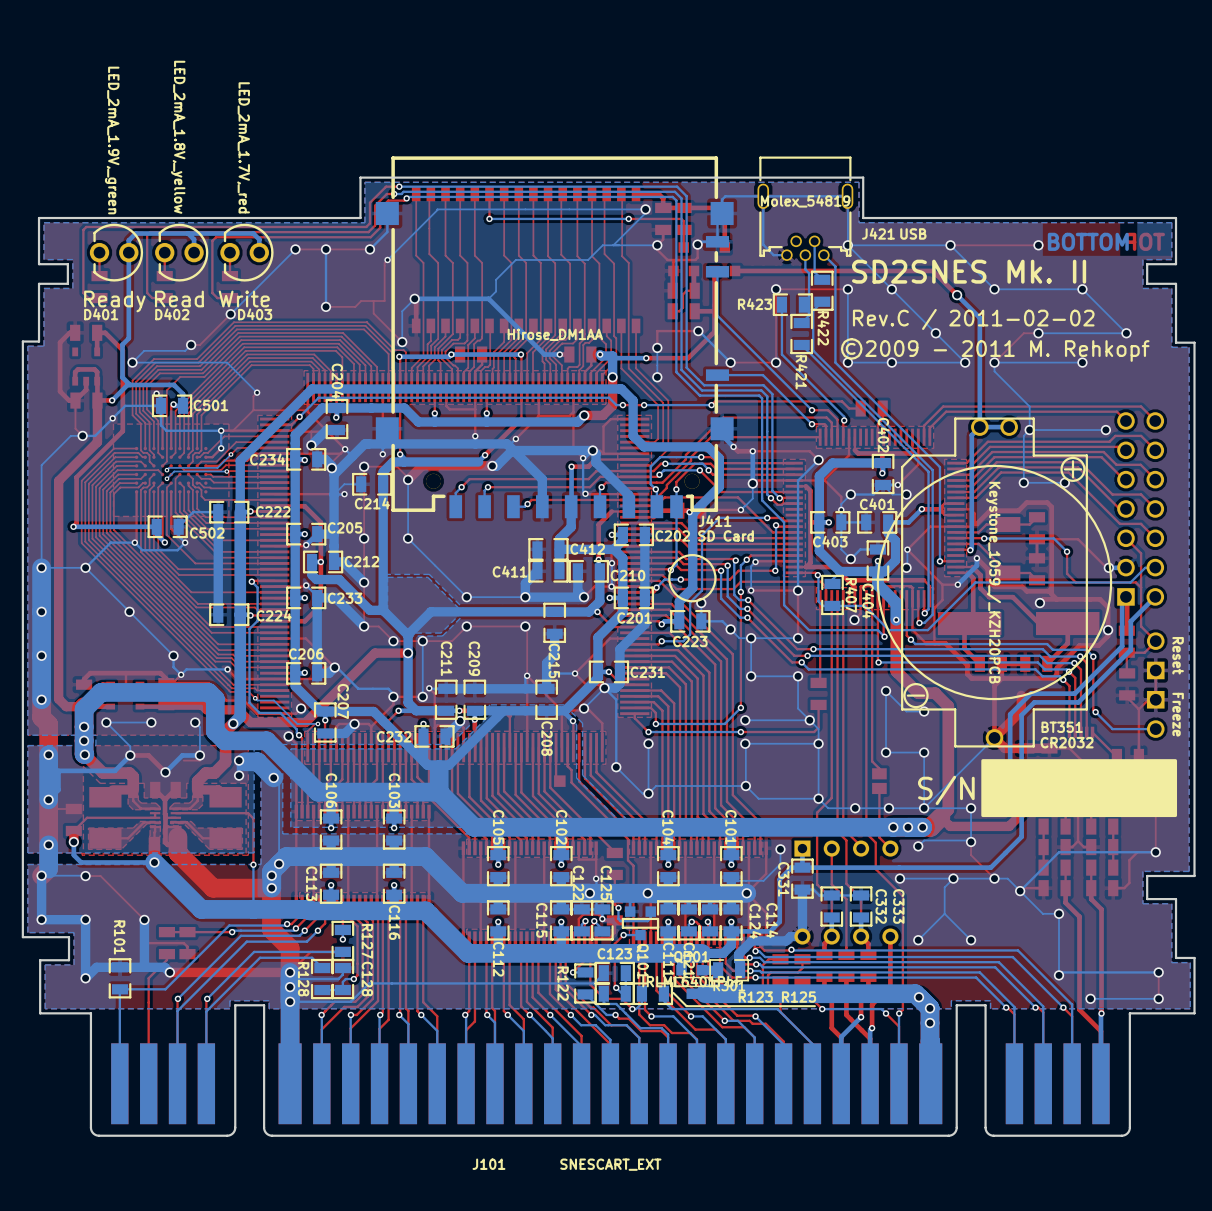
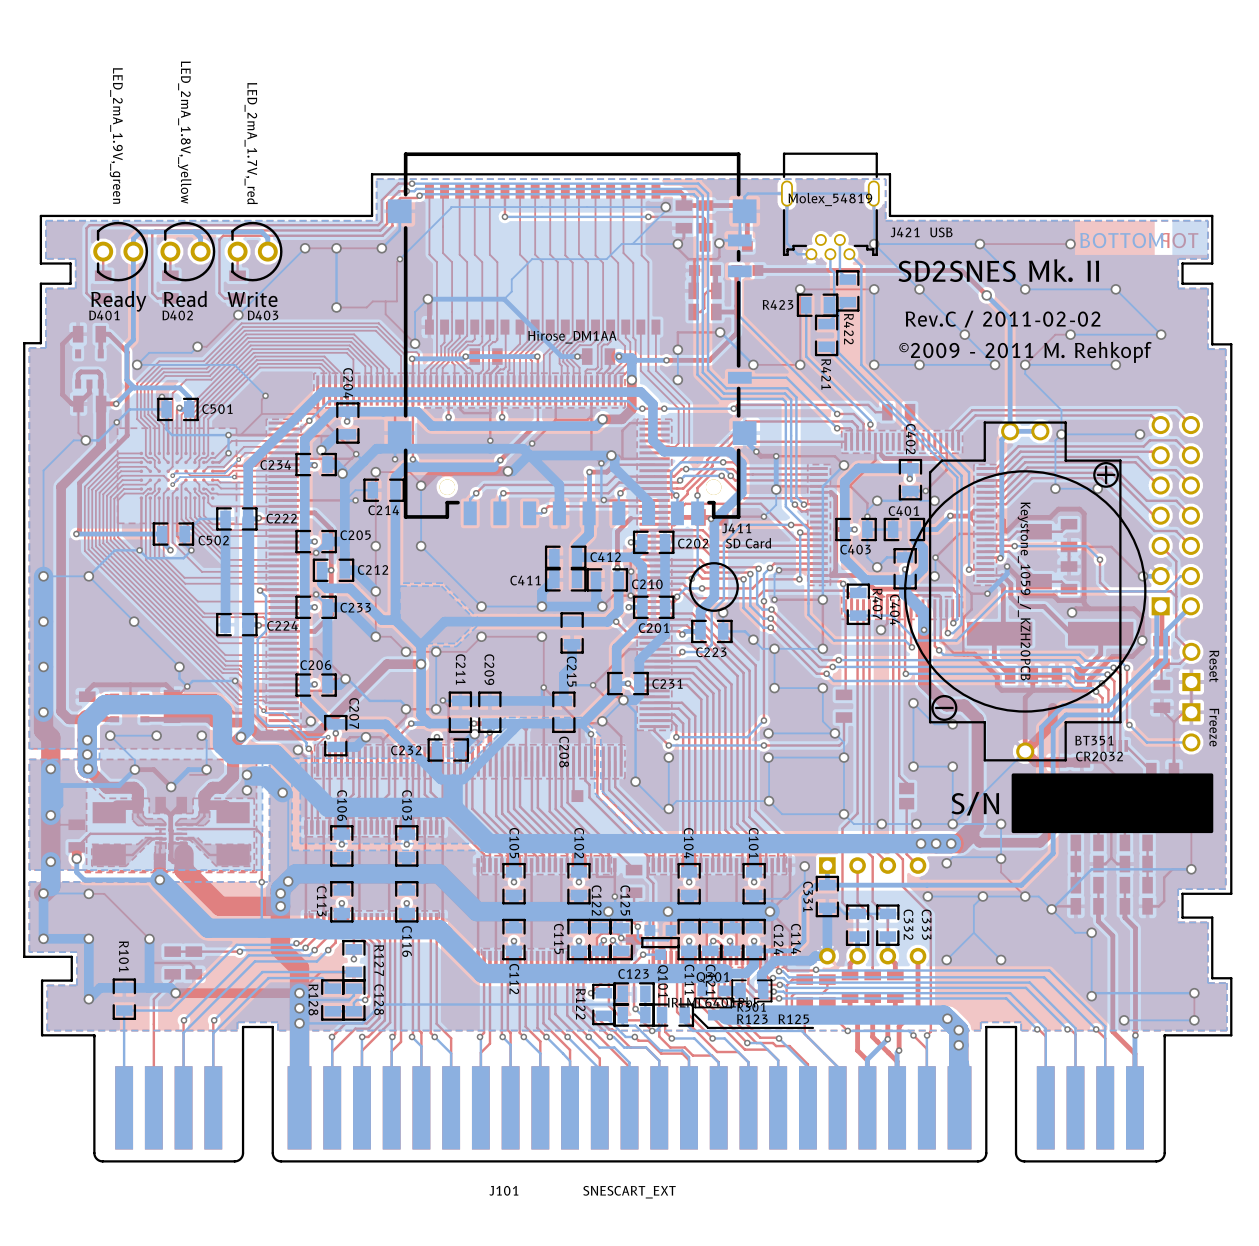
R123 name position: R123 (755, 997) -> R123 (752, 1019)
R125 name position: R125 (799, 997) -> R125 (793, 1019)
line: (814, 1006) (788, 1006) -> none

